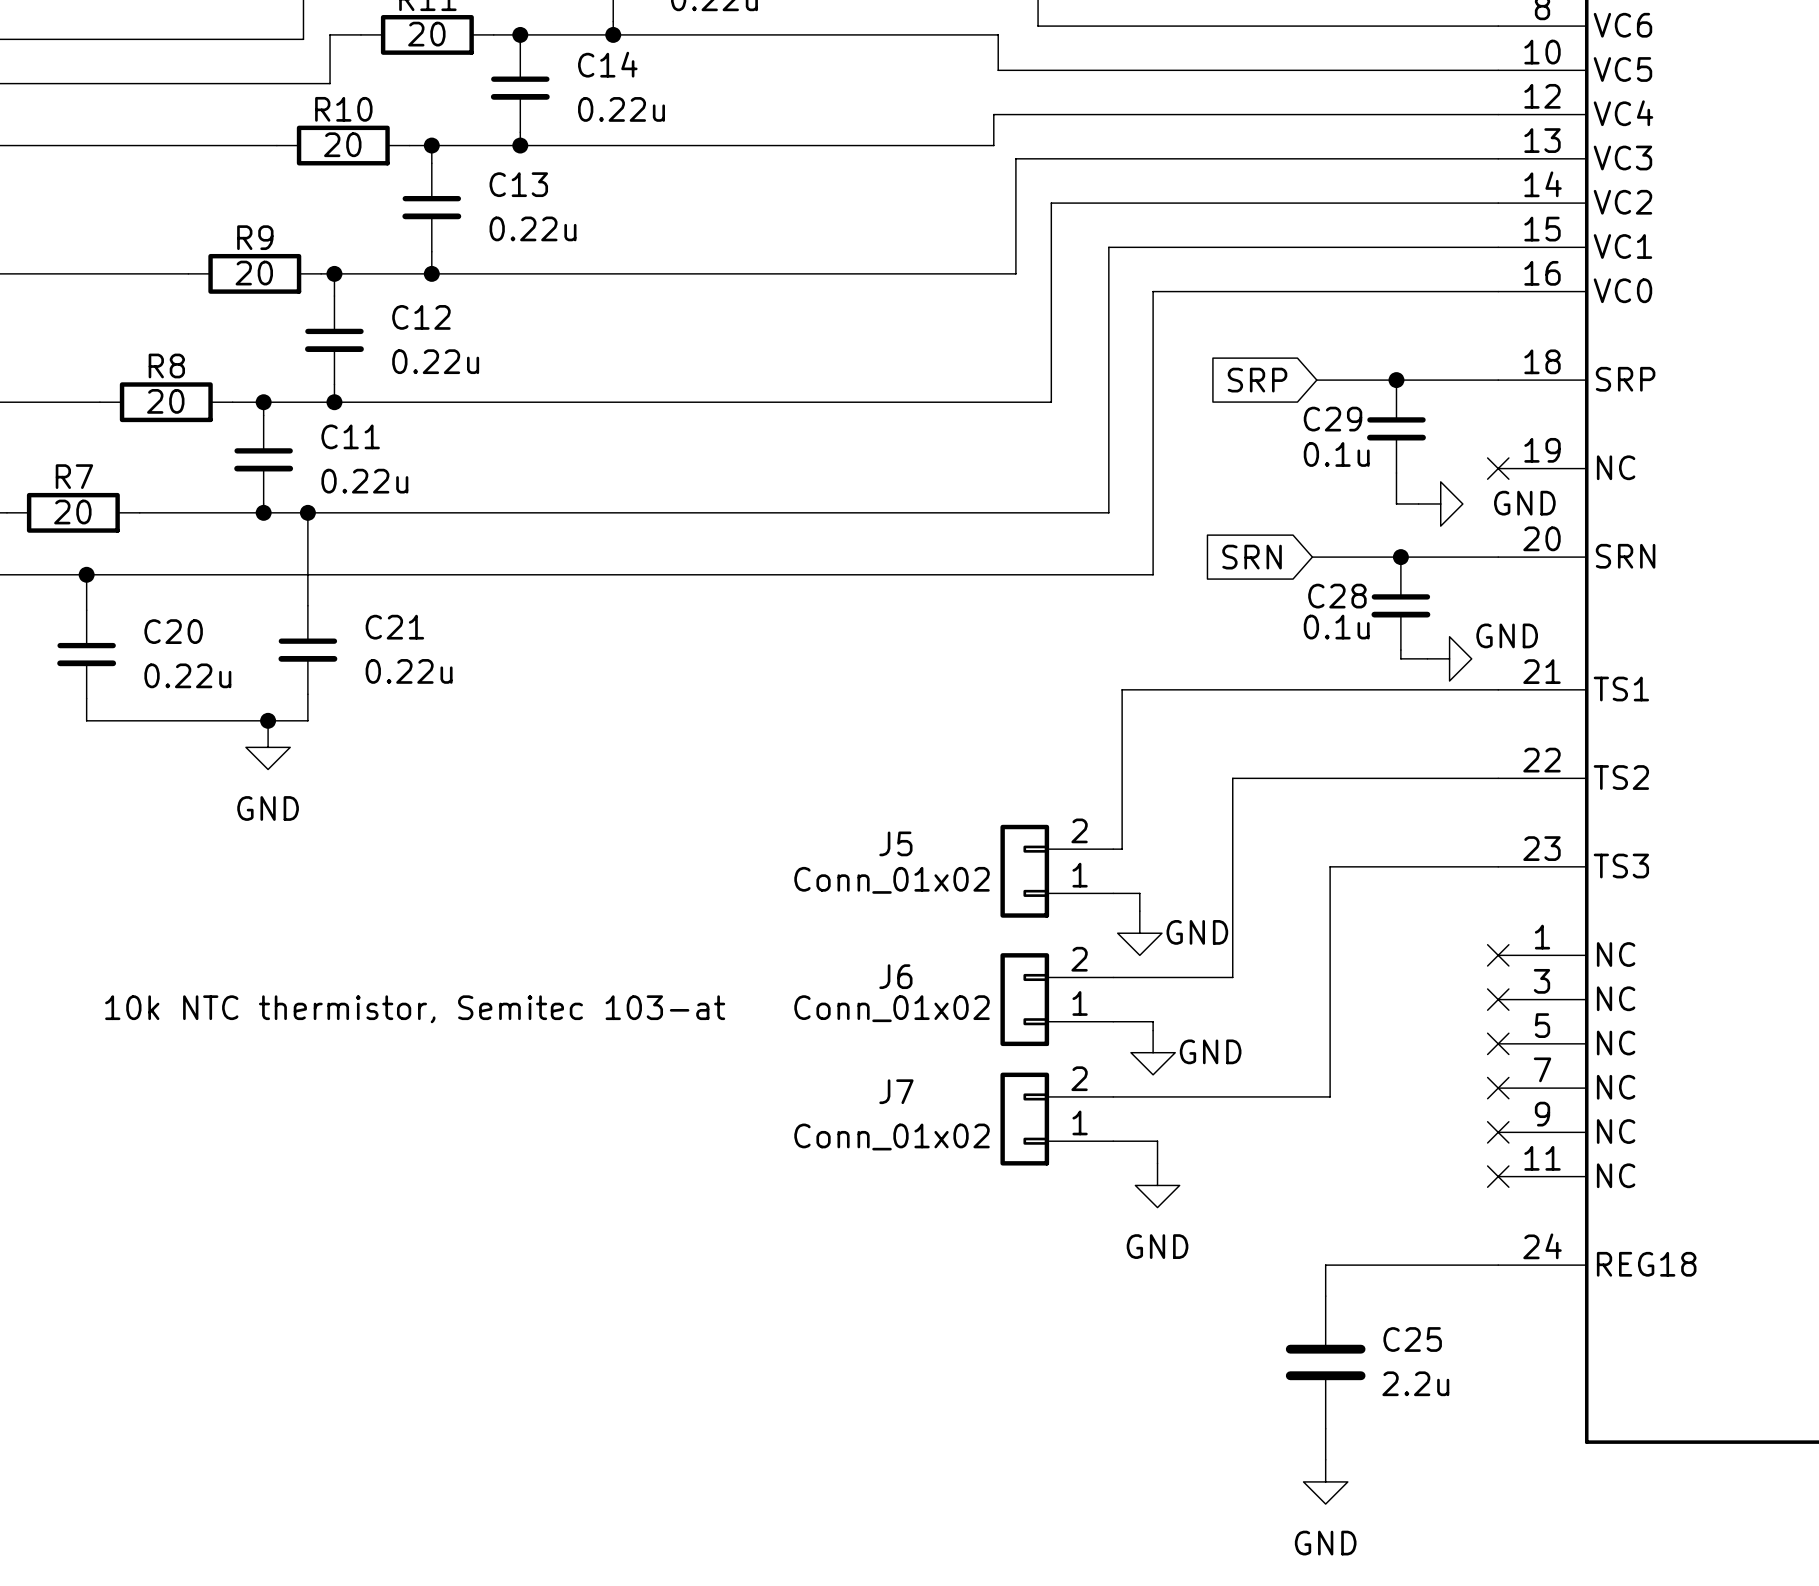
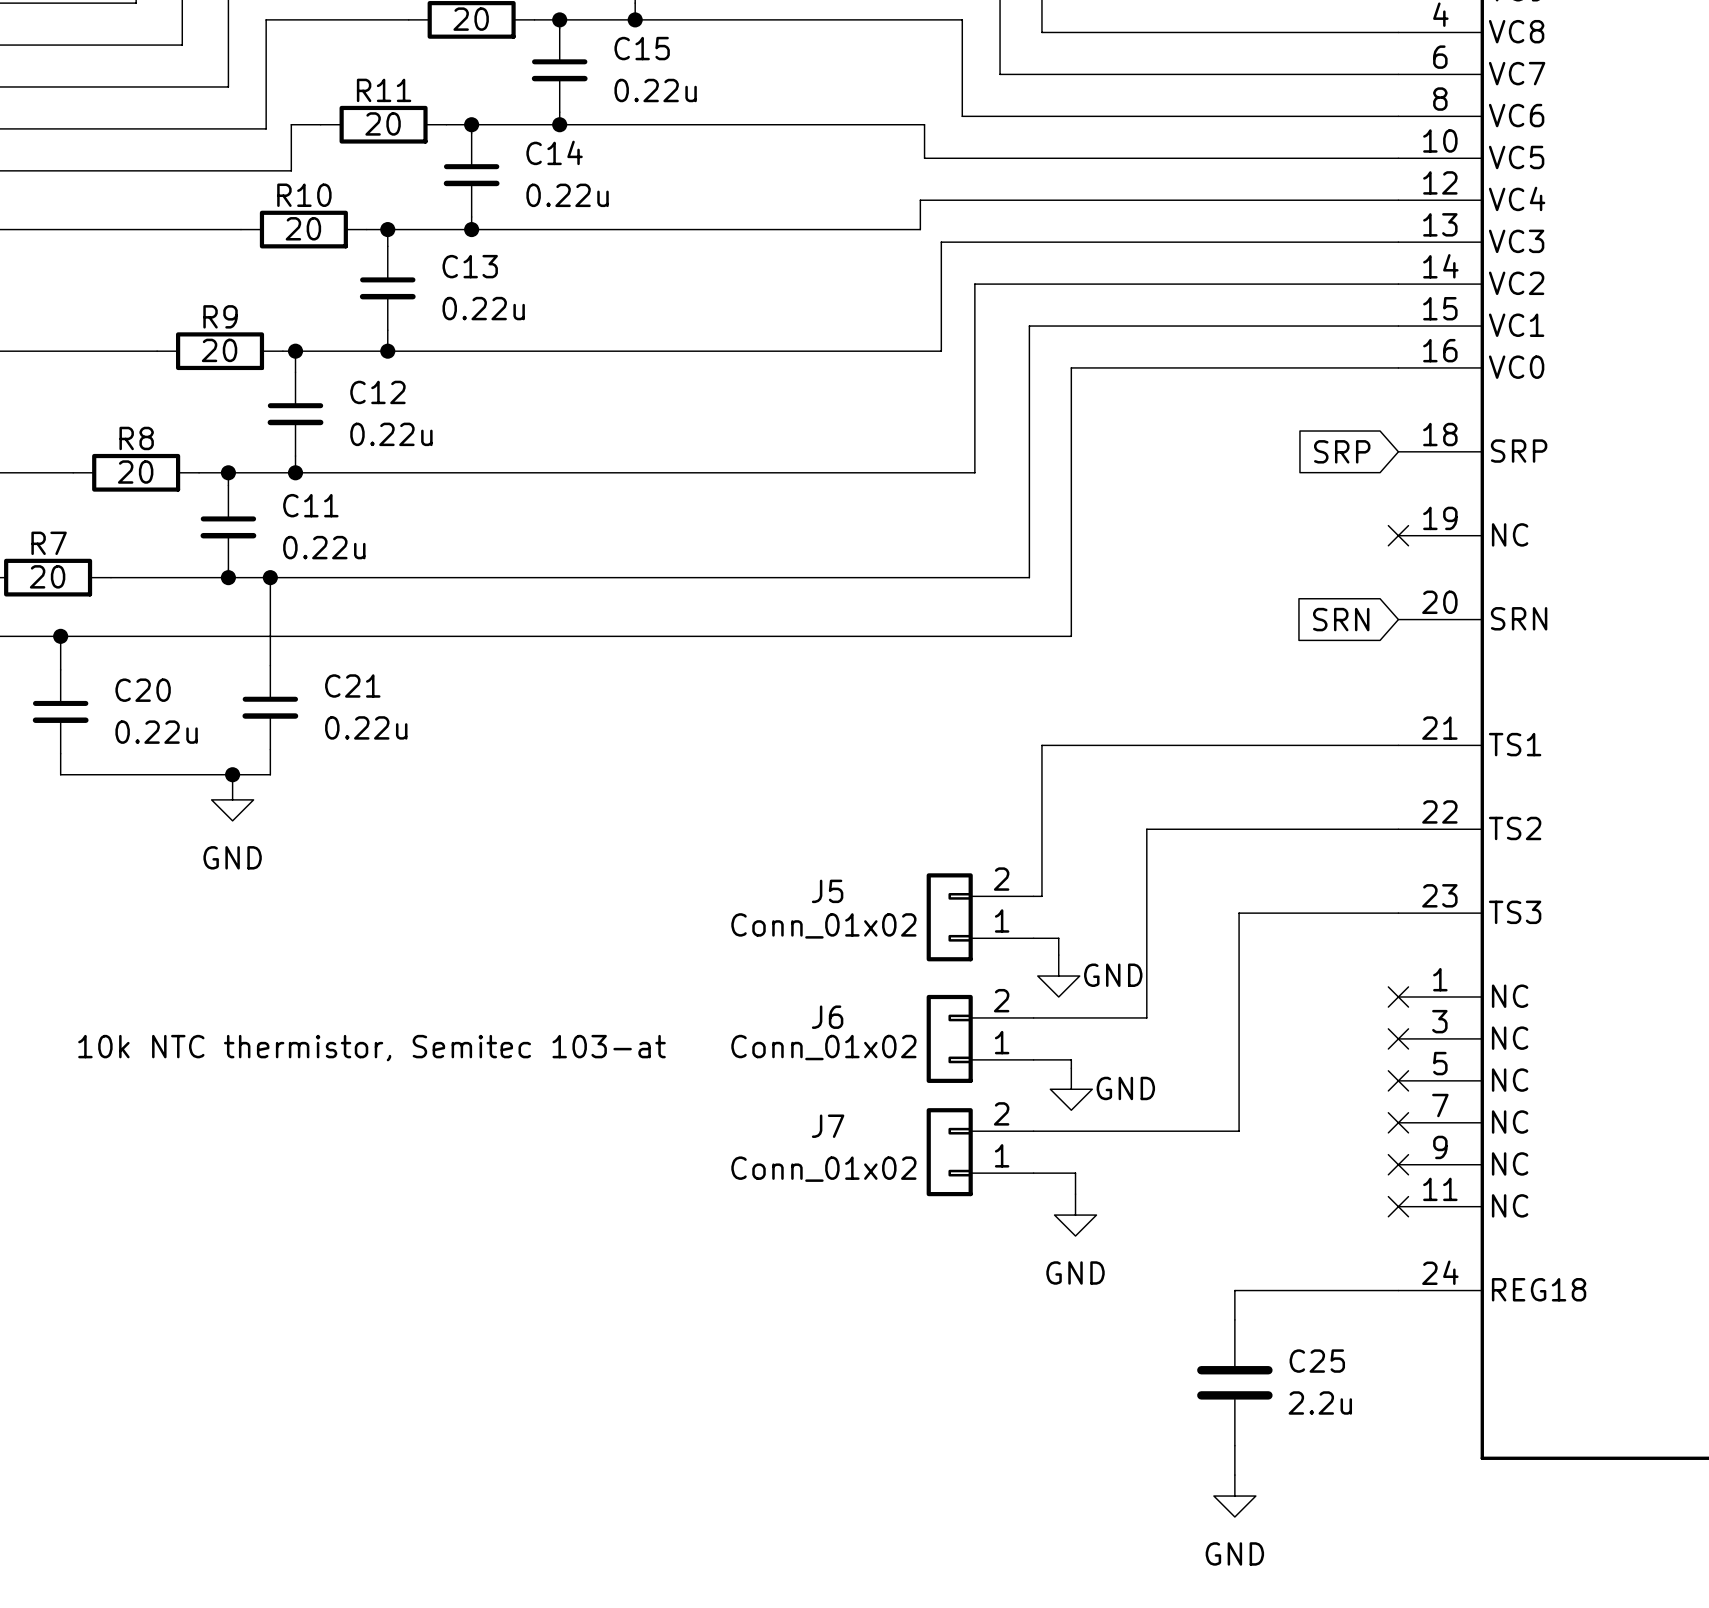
global label position: SRP (1257, 380) -> SRP (1342, 451)
wire: (1316, 380) (1498, 380) -> none
junction: (1396, 380) -> none
C29: 0.1u (1396, 428) -> none
wire: (1396, 473) (1396, 503) (1418, 503) -> none
power symbol: GND (1440, 503) -> none
global label position: SRN (1252, 557) -> SRN (1341, 619)
wire: (1312, 557) (1498, 557) -> none
junction: (1400, 557) -> none
C28: 0.1u (1400, 605) -> none
wire: (1400, 650) (1400, 658) (1427, 658) -> none
power symbol: GND (1449, 658) -> none

